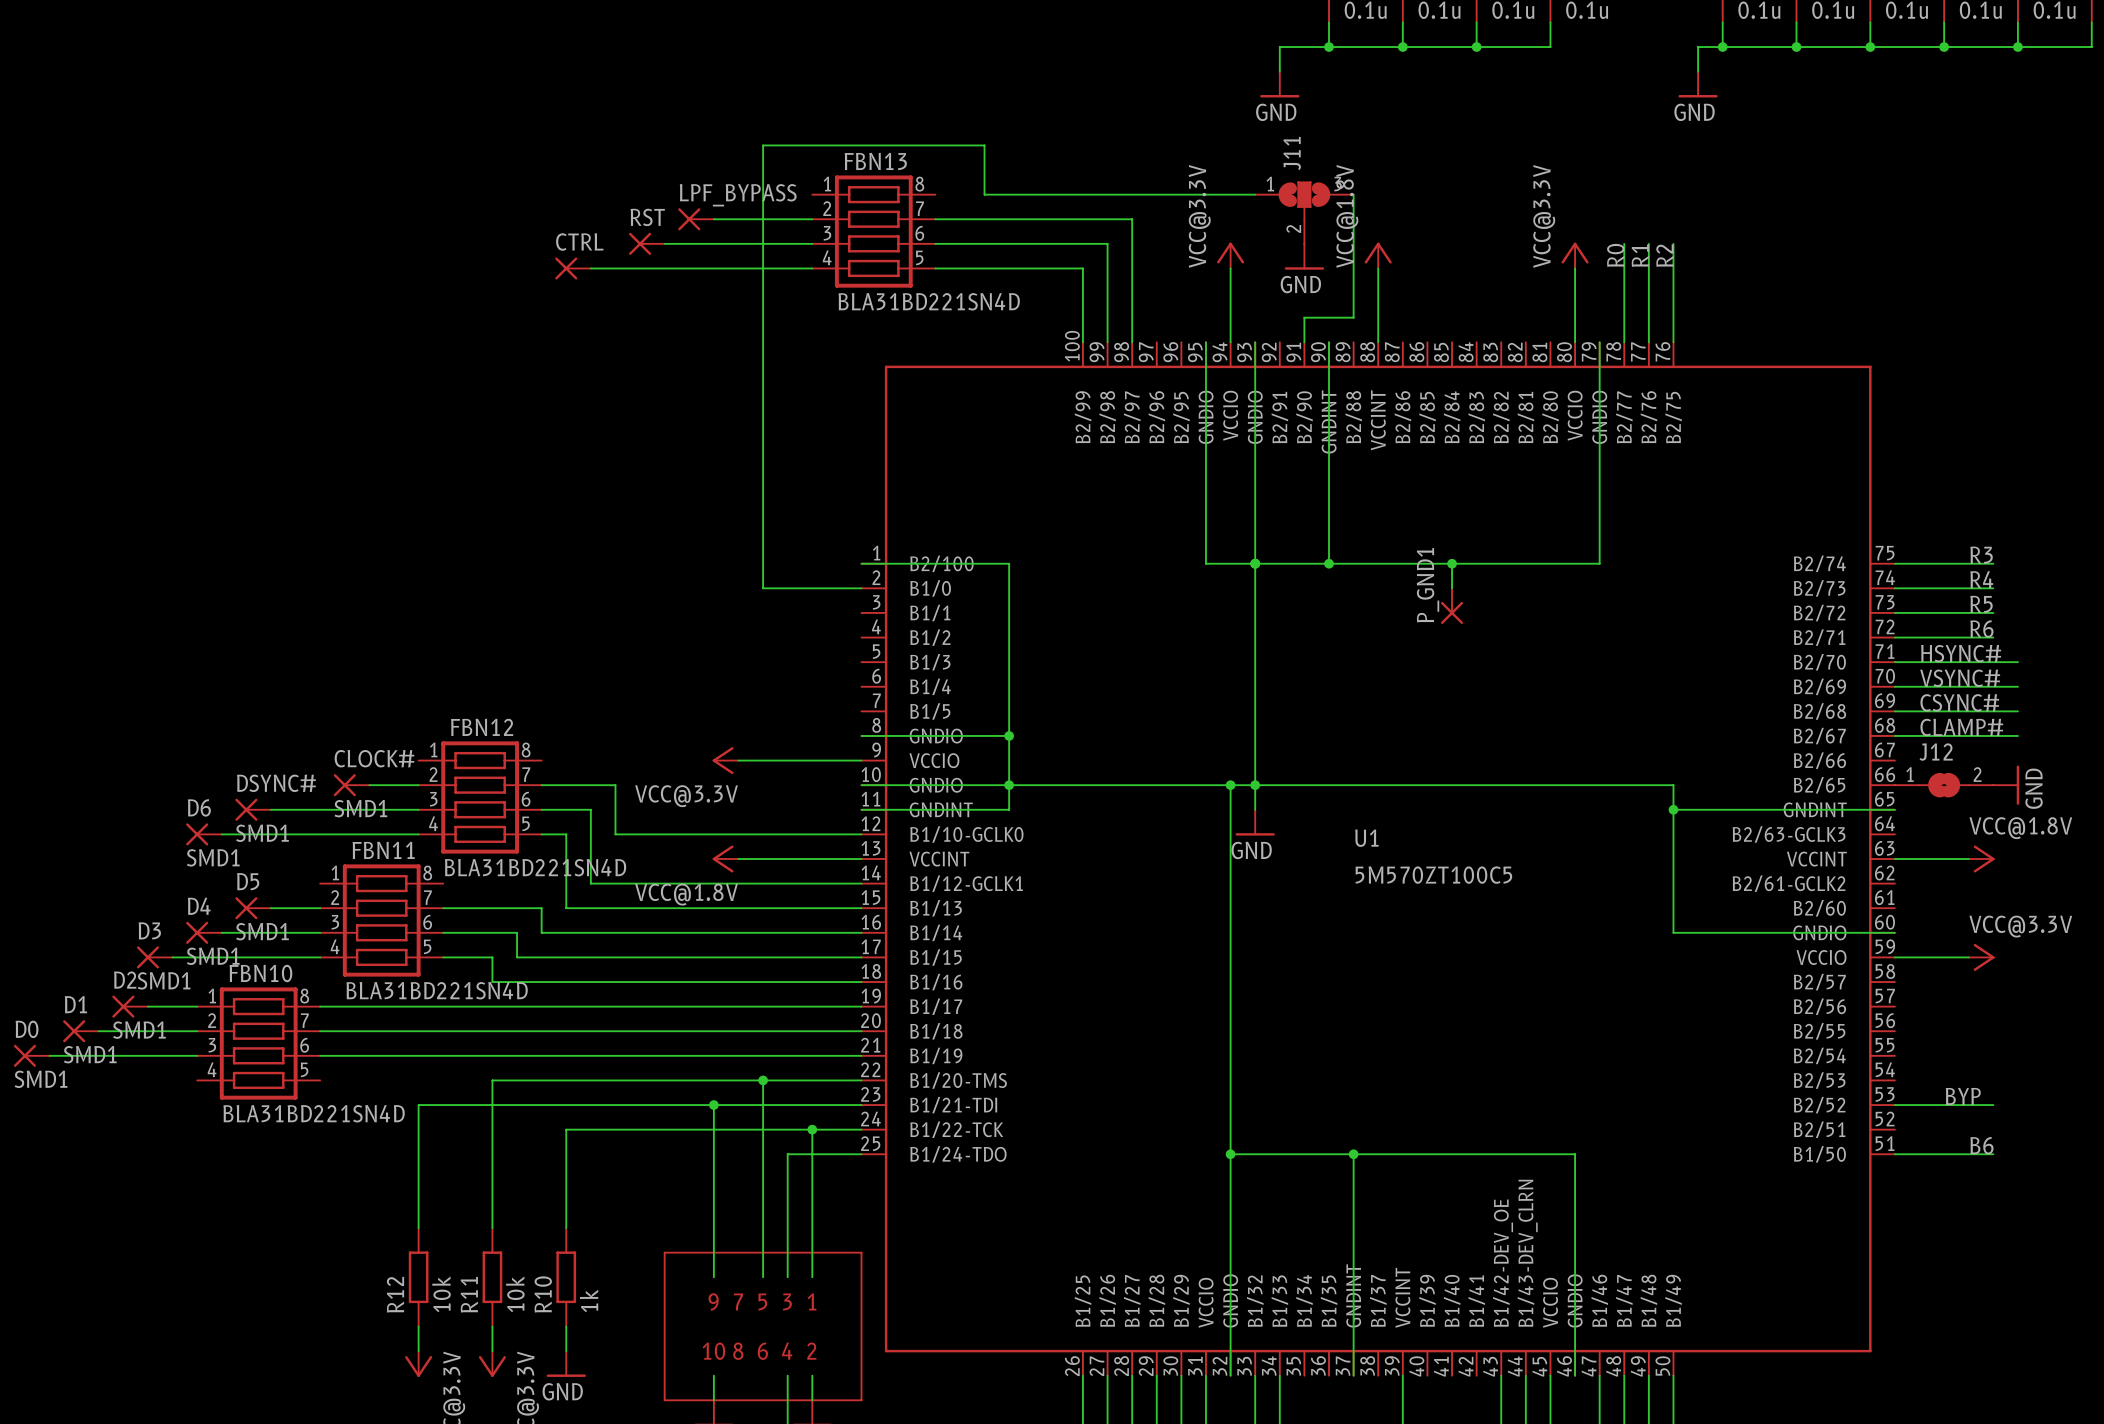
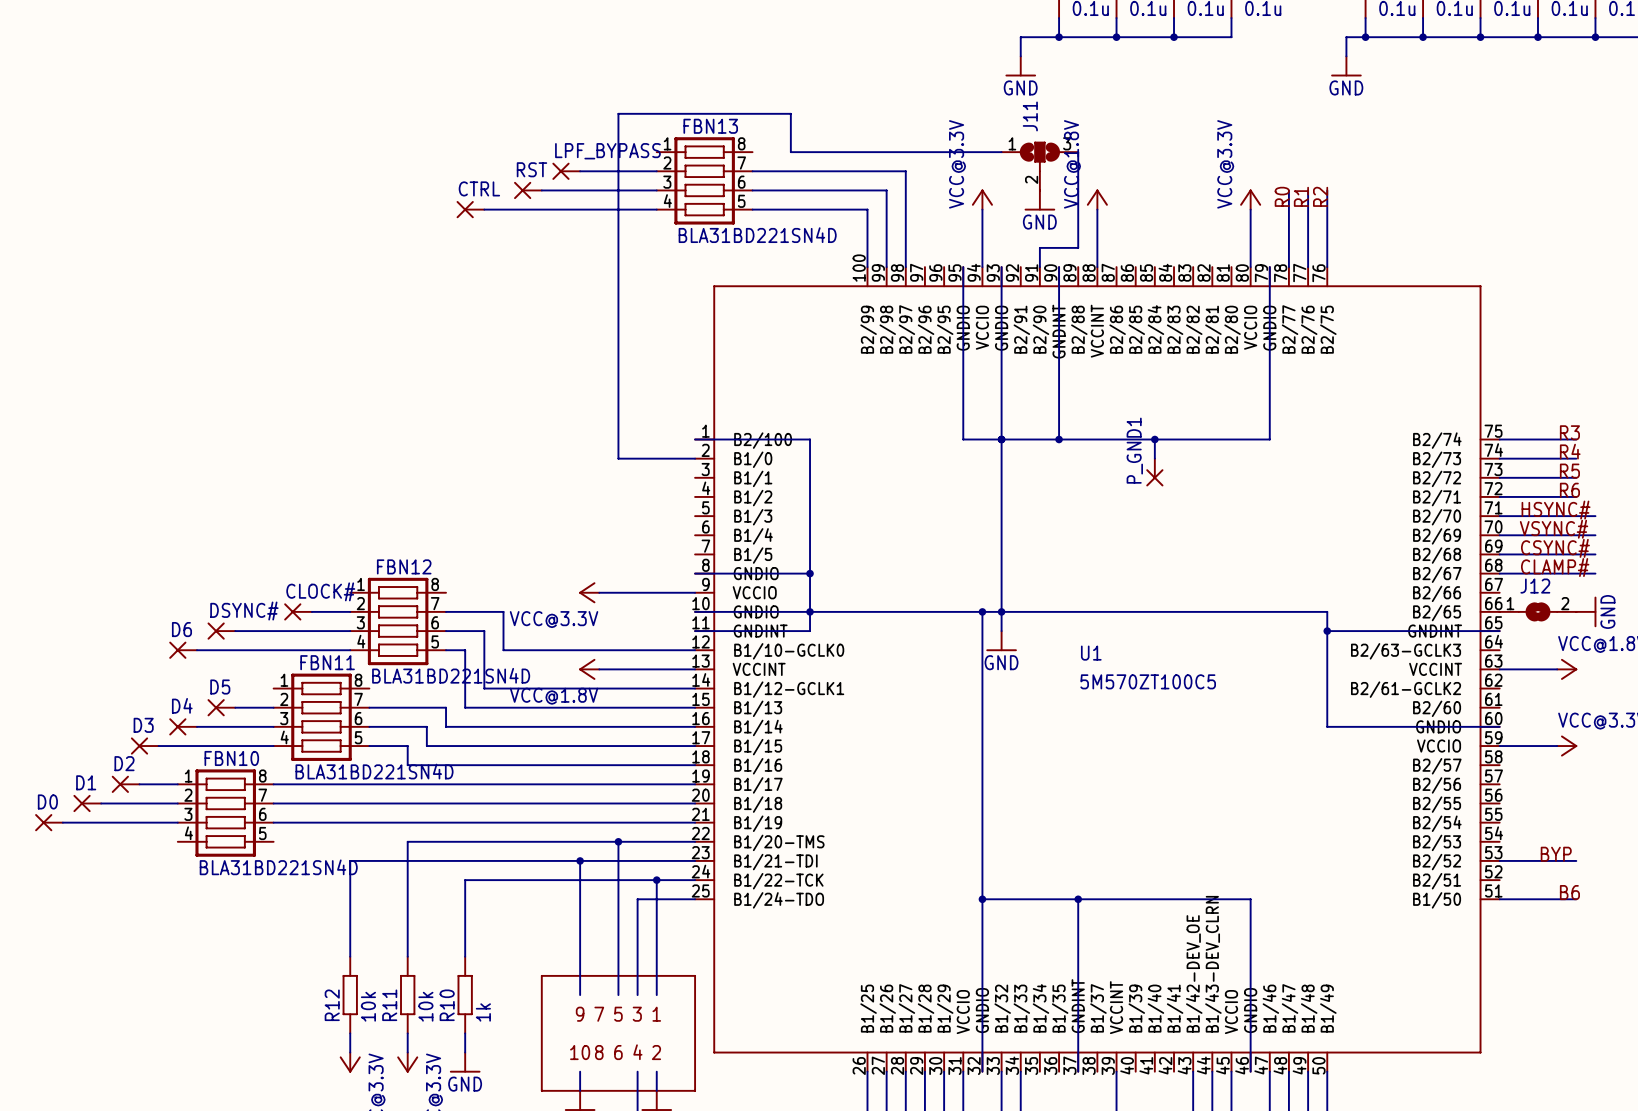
CLOCK# value: SMD1 (360, 808) -> none
DSYNC# value: SMD1 (262, 833) -> none
D6 value: SMD1 (213, 857) -> none
D5 value: SMD1 (262, 931) -> none
D4 value: SMD1 (213, 956) -> none
D3 value: SMD1 (164, 980) -> none
D2 value: SMD1 (139, 1030) -> none
D1 value: SMD1 (90, 1054) -> none
D0 value: SMD1 (41, 1079) -> none

